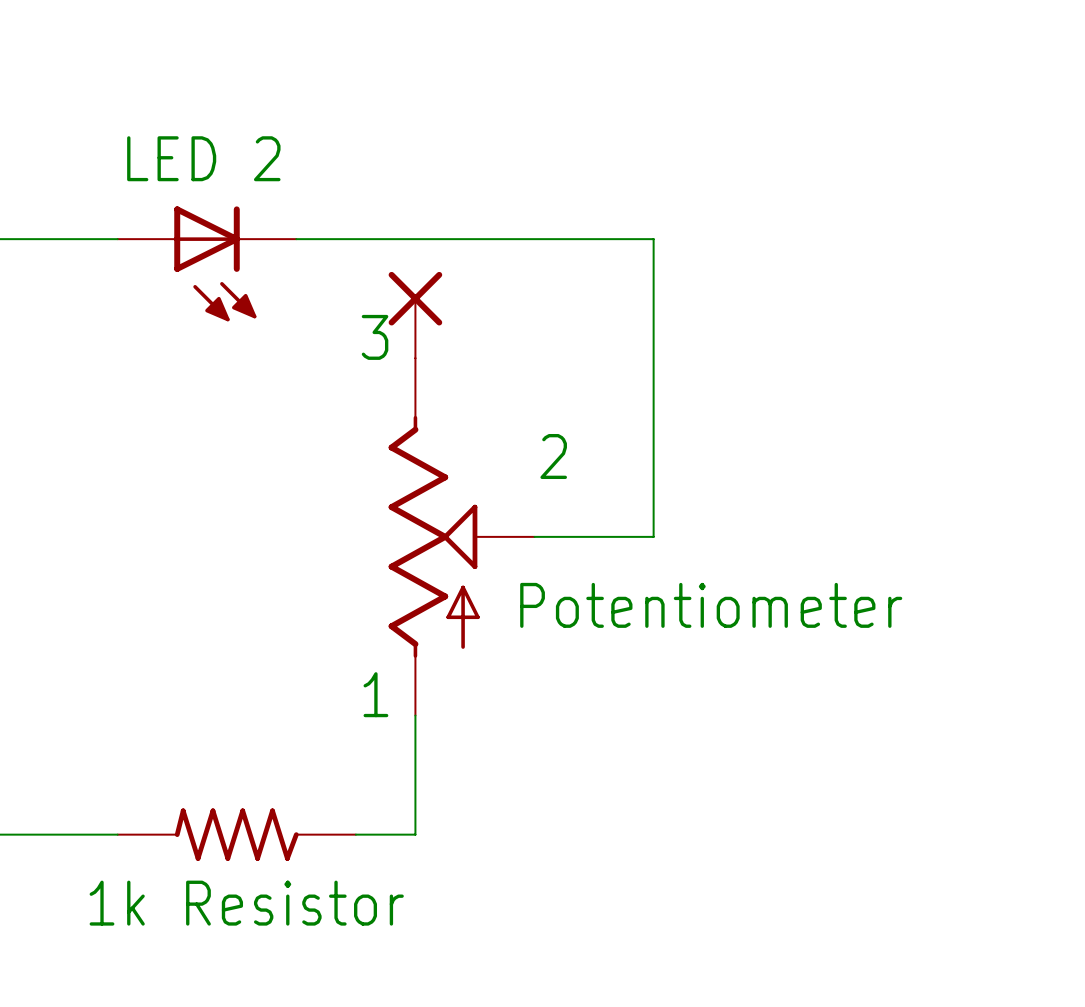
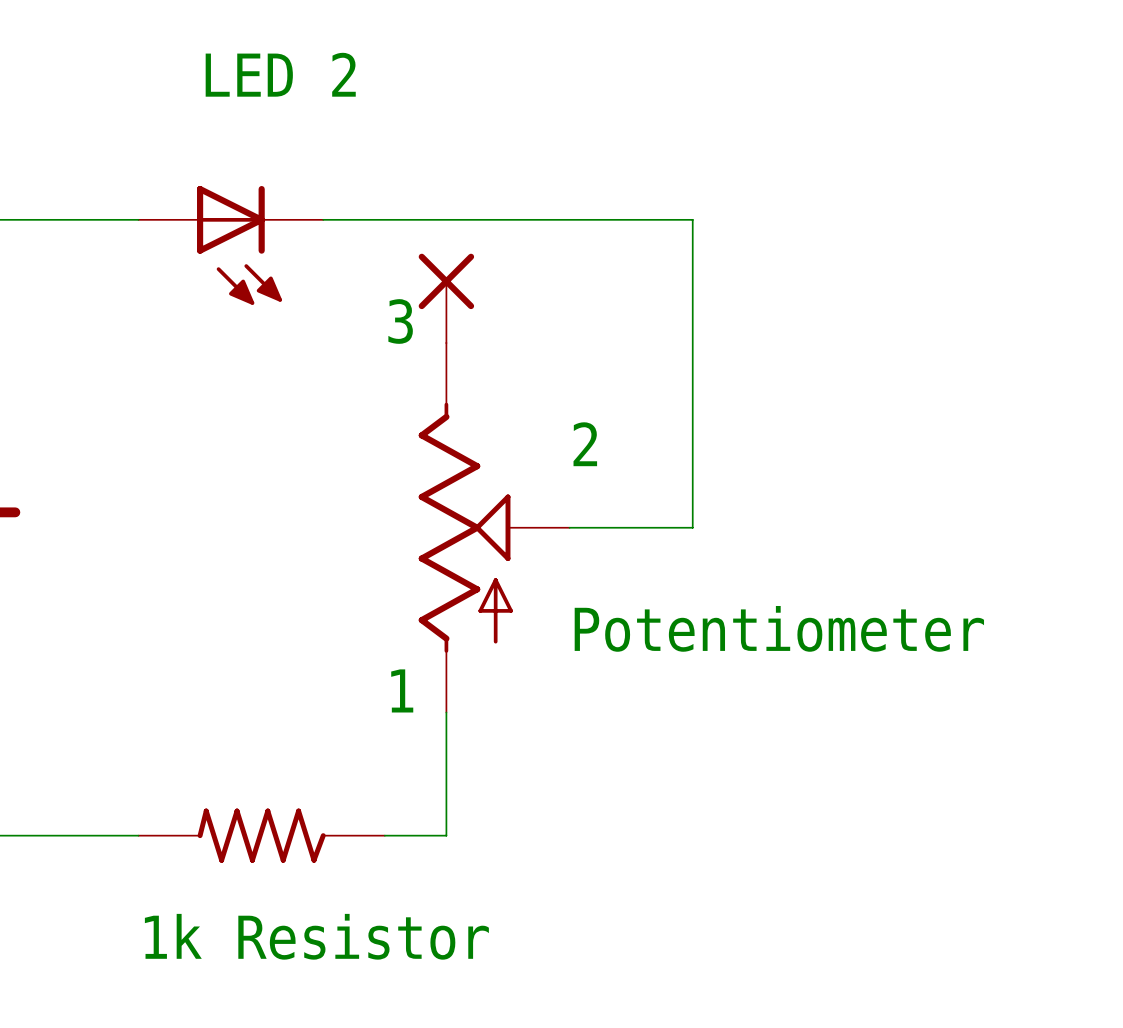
text position: LED 2 (203, 158) -> LED 2 (280, 74)
text position: Potentiometer (711, 605) -> Potentiometer (779, 628)
text position: 1k Resistor (246, 903) -> 1k Resistor (316, 936)

